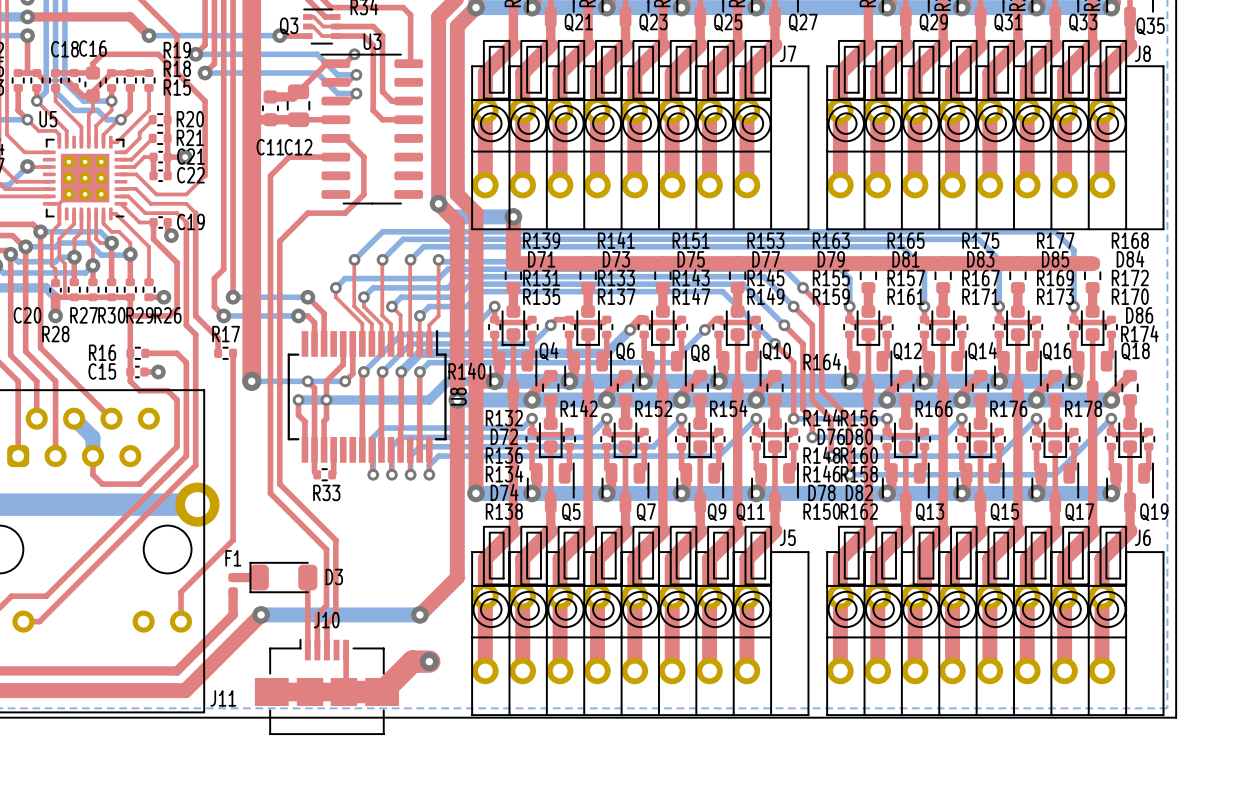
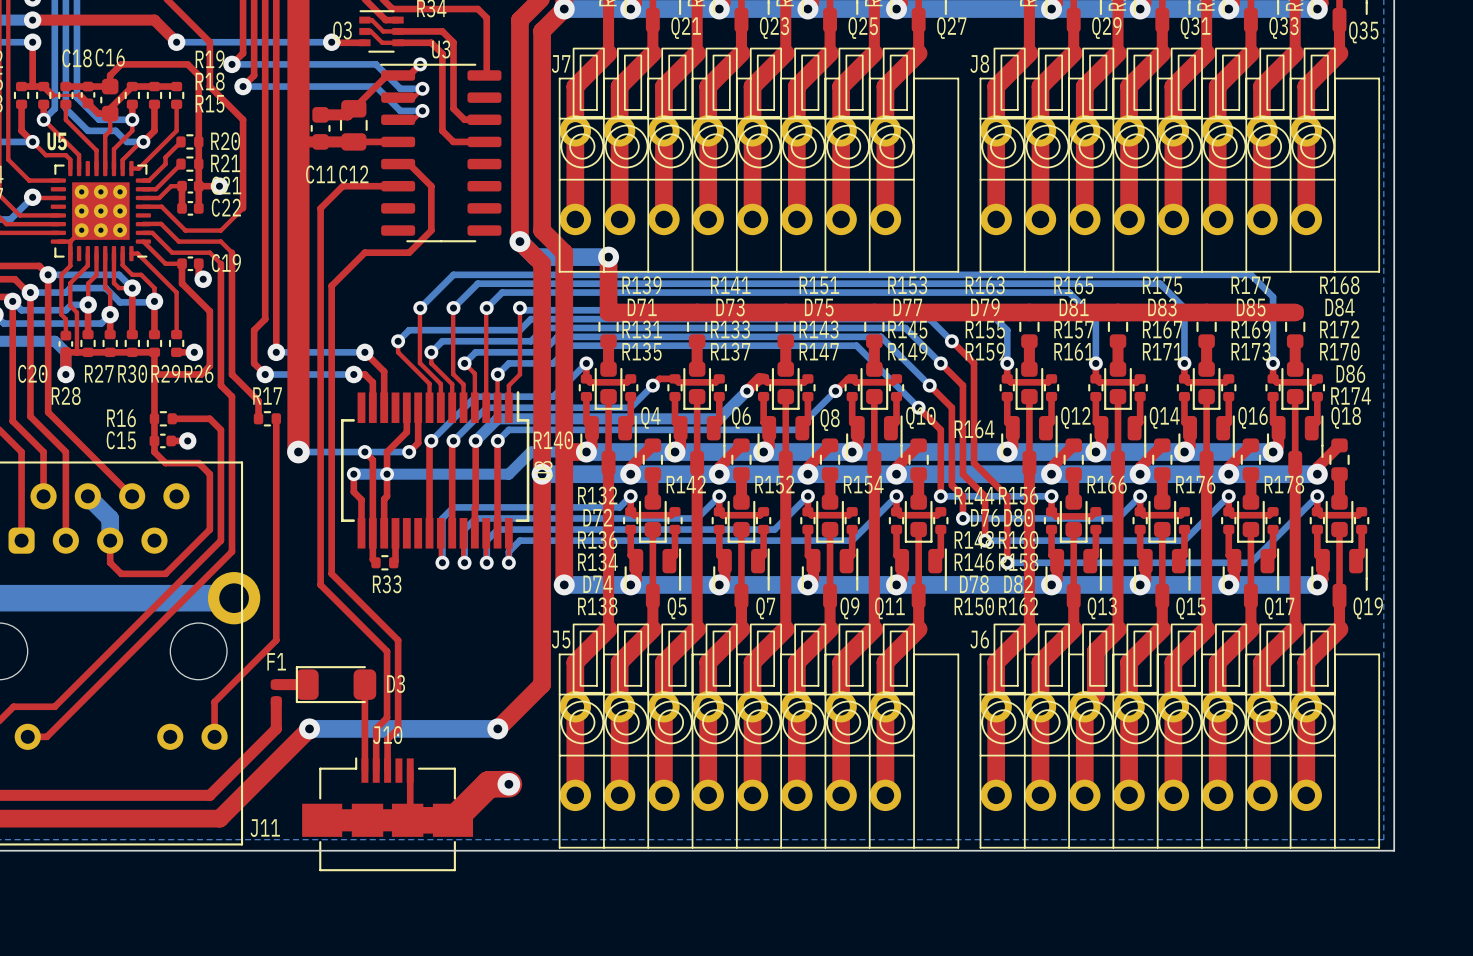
J7 name position: J7 (788, 53) -> J7 (561, 63)
J8 name position: J8 (1142, 53) -> J8 (979, 63)
J5 name position: J5 (787, 537) -> J5 (561, 639)
J6 name position: J6 (1142, 537) -> J6 (979, 639)

